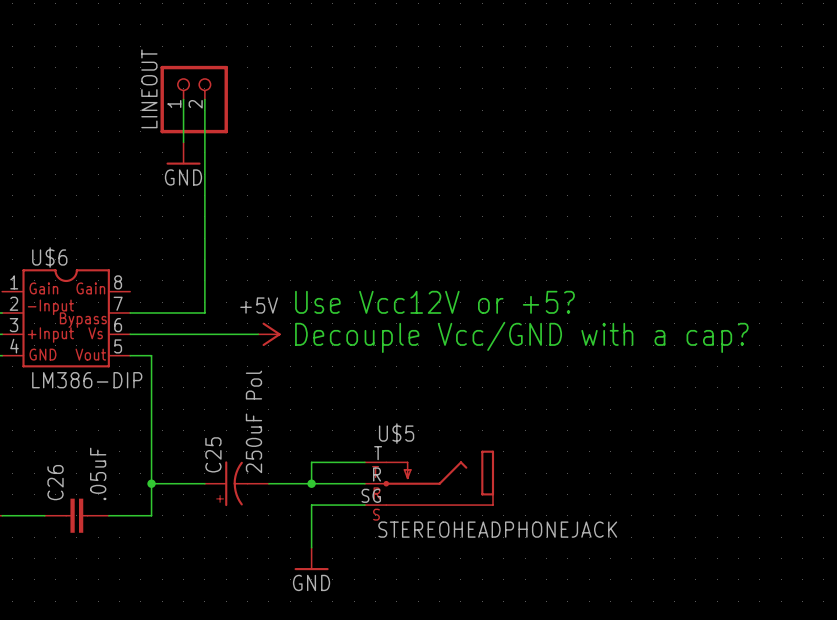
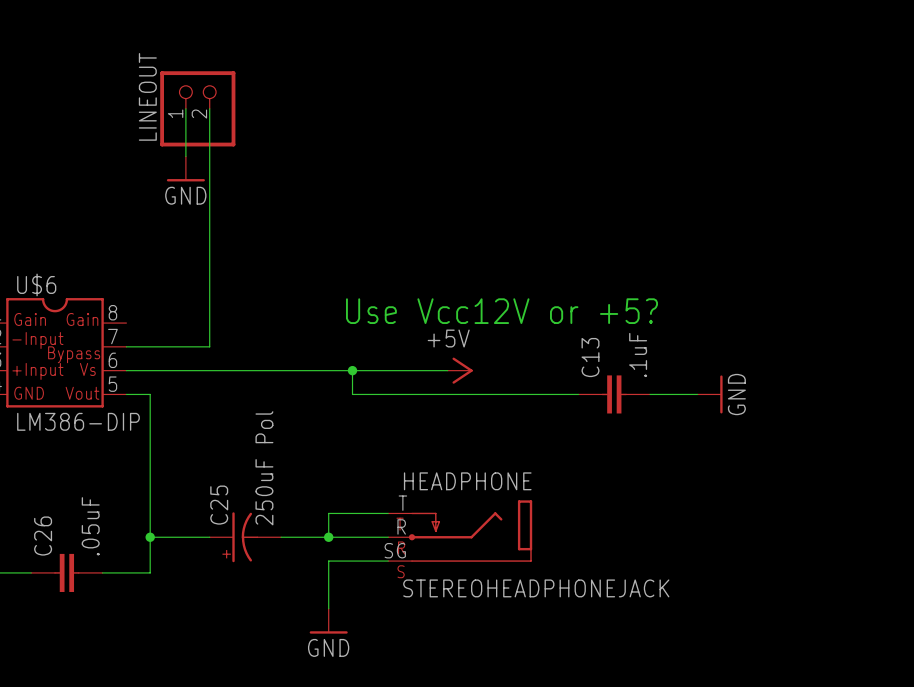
text position: Use Vcc12V or +5? (434, 302) -> Use Vcc12V or +5? (502, 311)
wire: none -> (269, 370) (447, 370)
power symbol position: +5V (269, 334) -> +5V (460, 370)
wire: none -> (352, 370) (352, 394) (578, 394)
junction: none -> (352, 370)
text: Decouple Vcc/GND with a cap? (521, 337) -> none
C13: none -> .1uF (614, 394)
wire: none -> (650, 394) (697, 394)
power symbol: none -> GND (710, 394)
U$5 name: U$5 (396, 433) -> HEADPHONE (467, 481)

